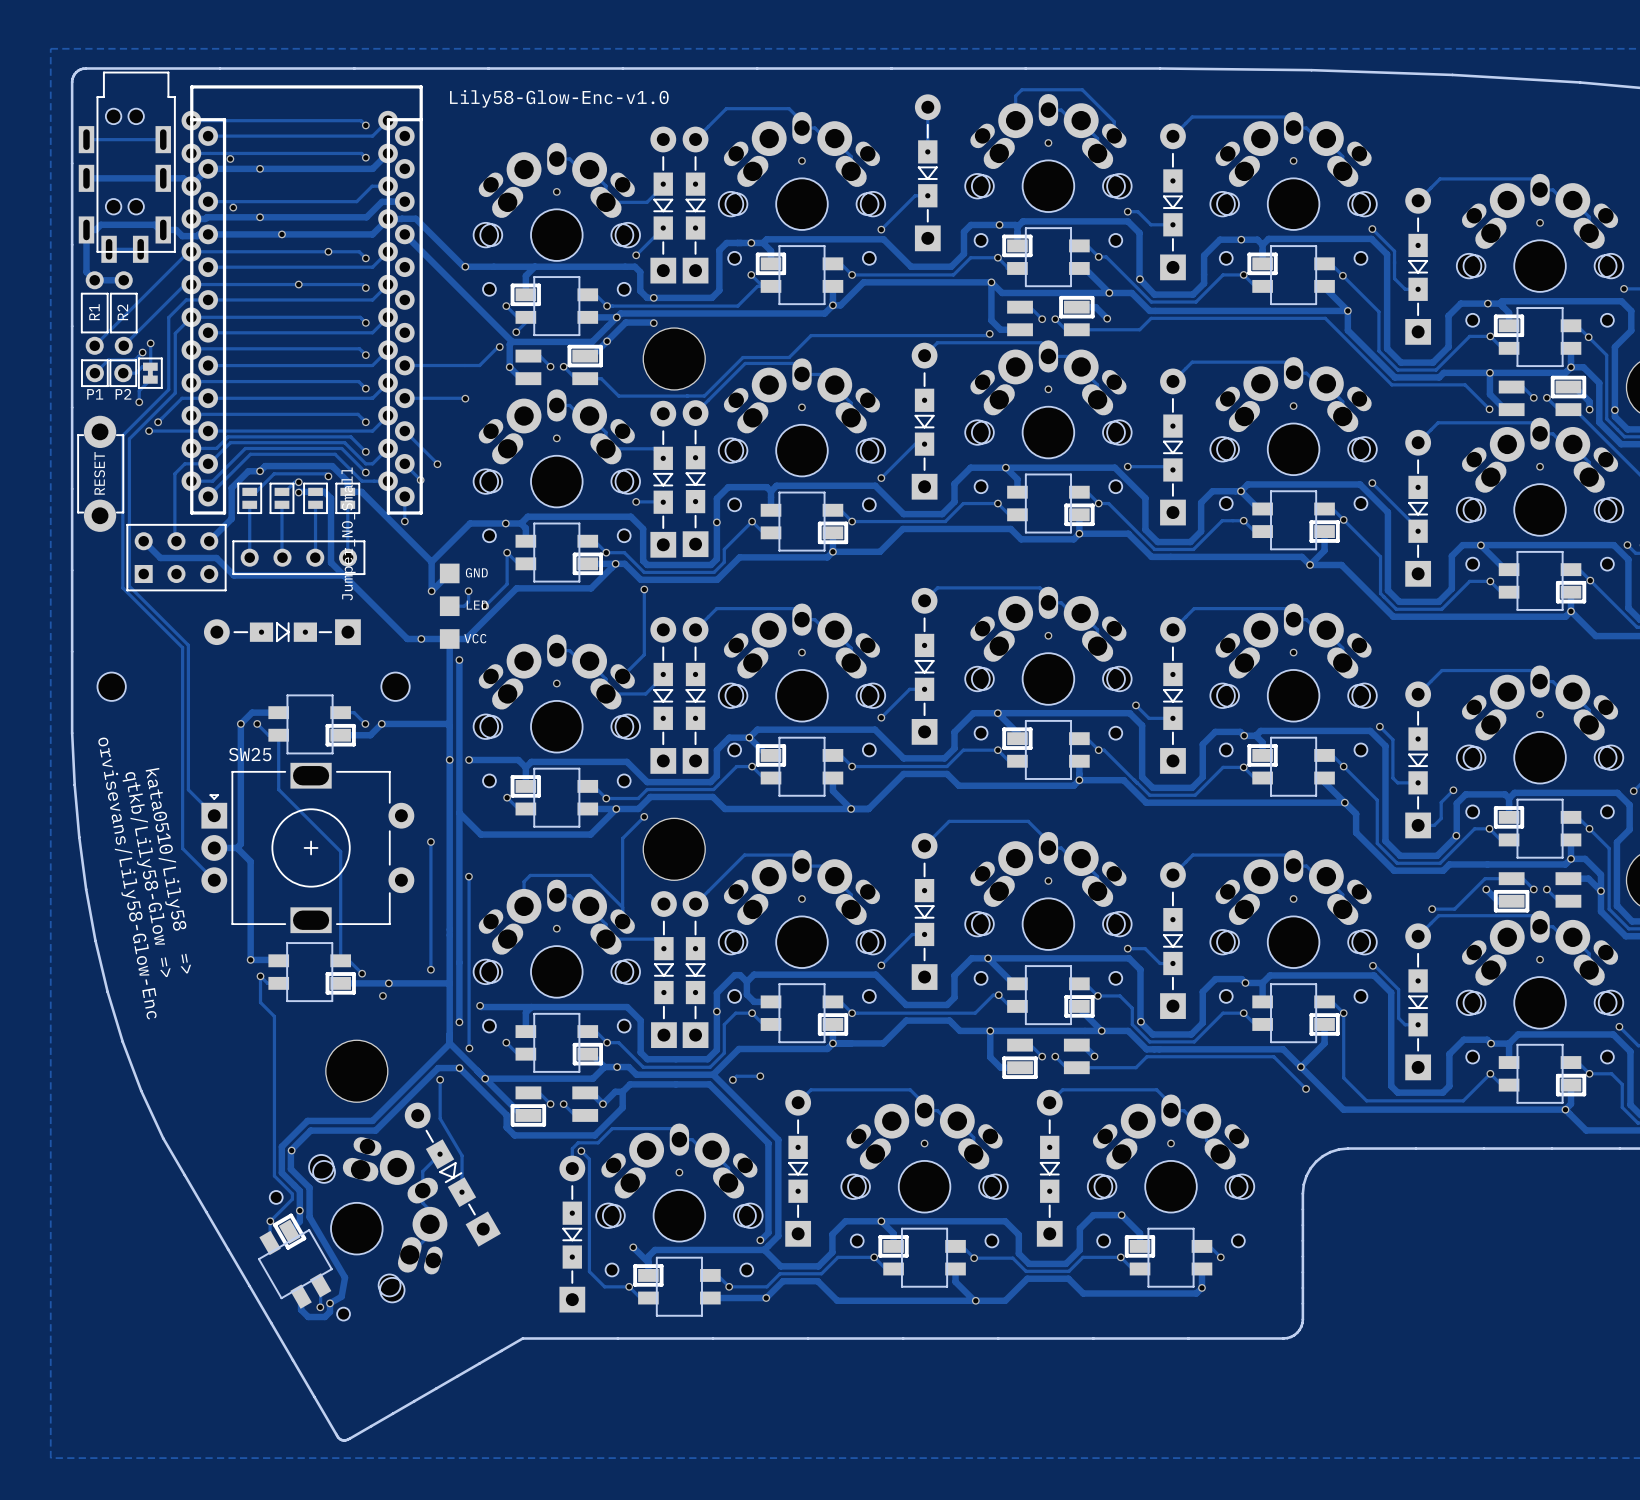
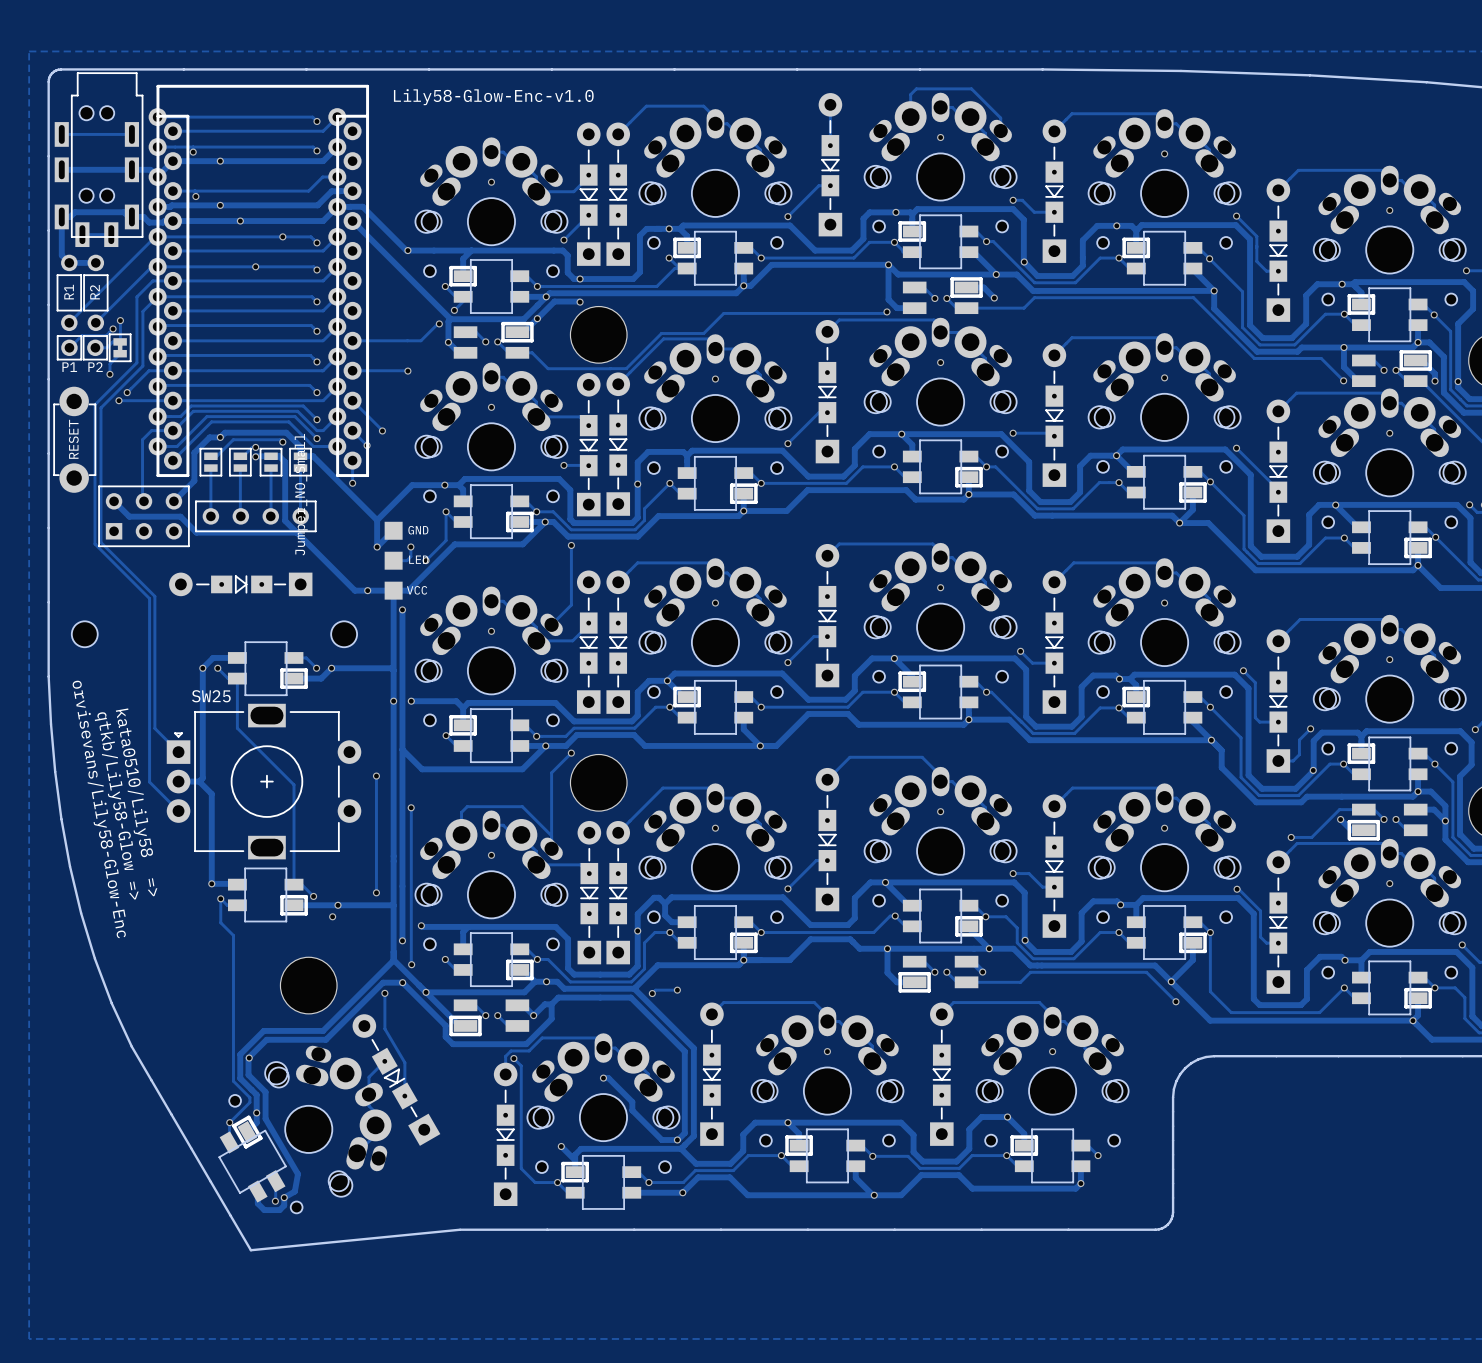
via: (801, 160) -> none
track: none -> (603, 1078) (608, 1078) (632, 1101) (632, 1110) (661, 1140) (677, 1140)
board edge: (271, 1323) (337, 1436) (343, 1440) (522, 1338) -> (230, 1215) (250, 1250) (459, 1229)

